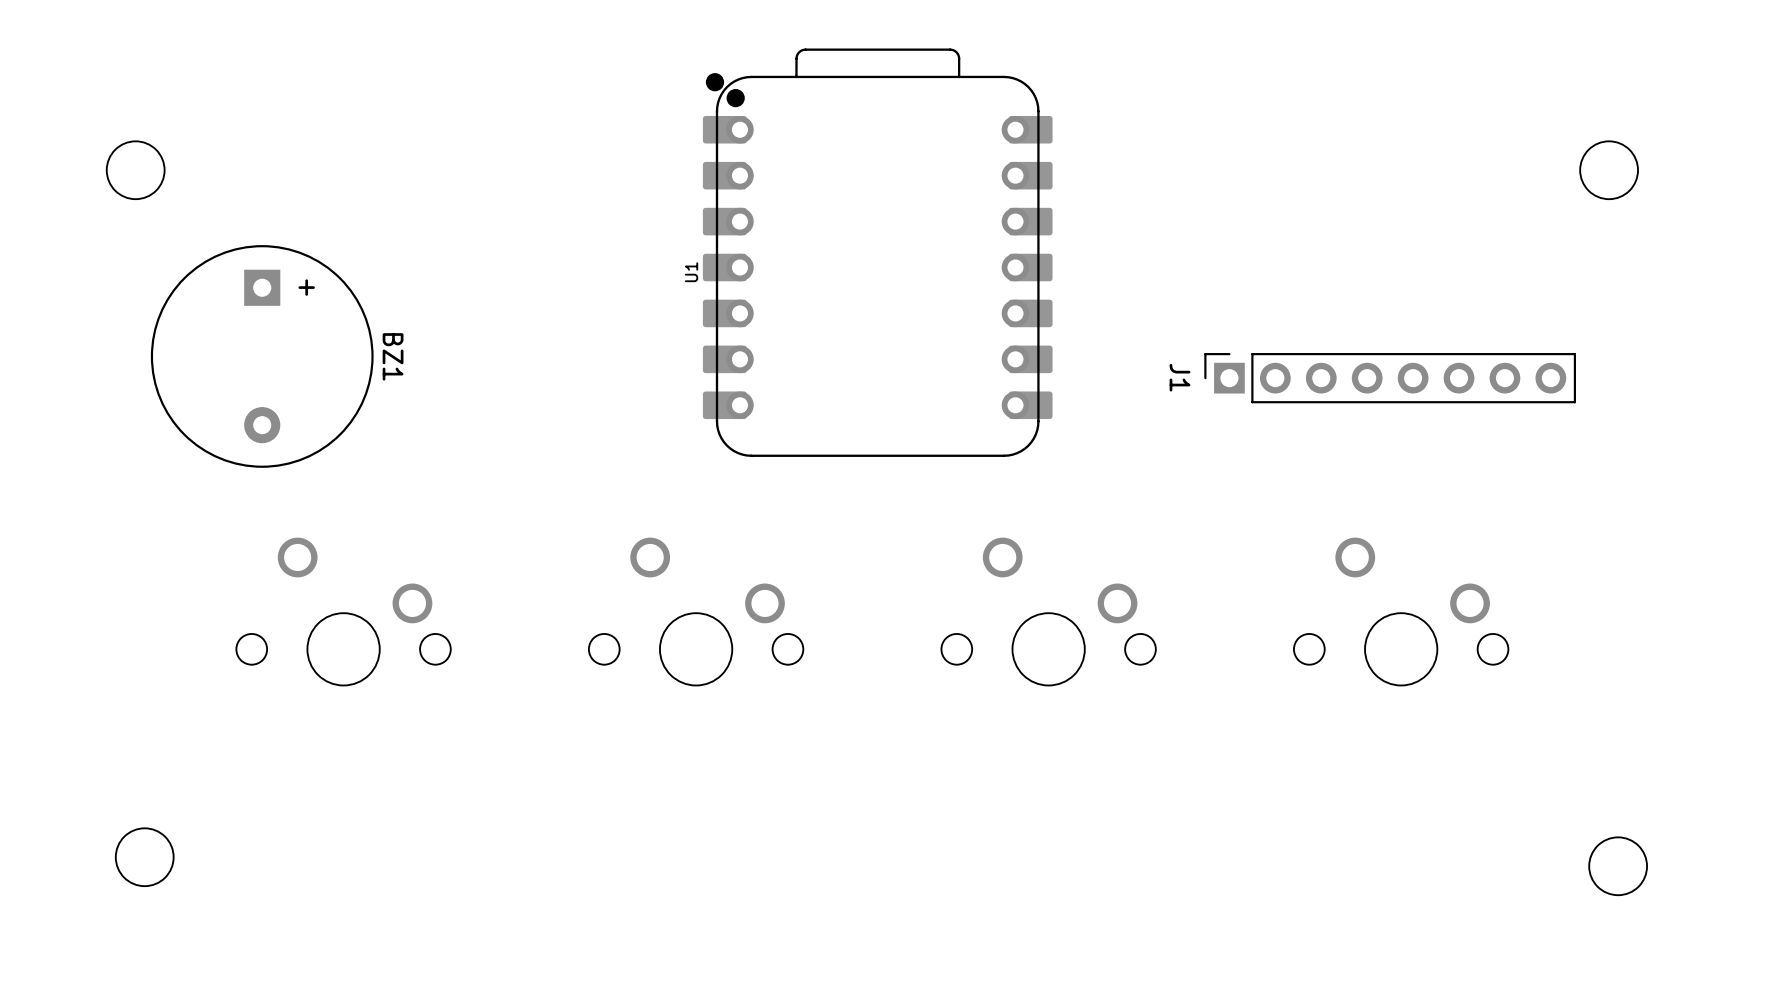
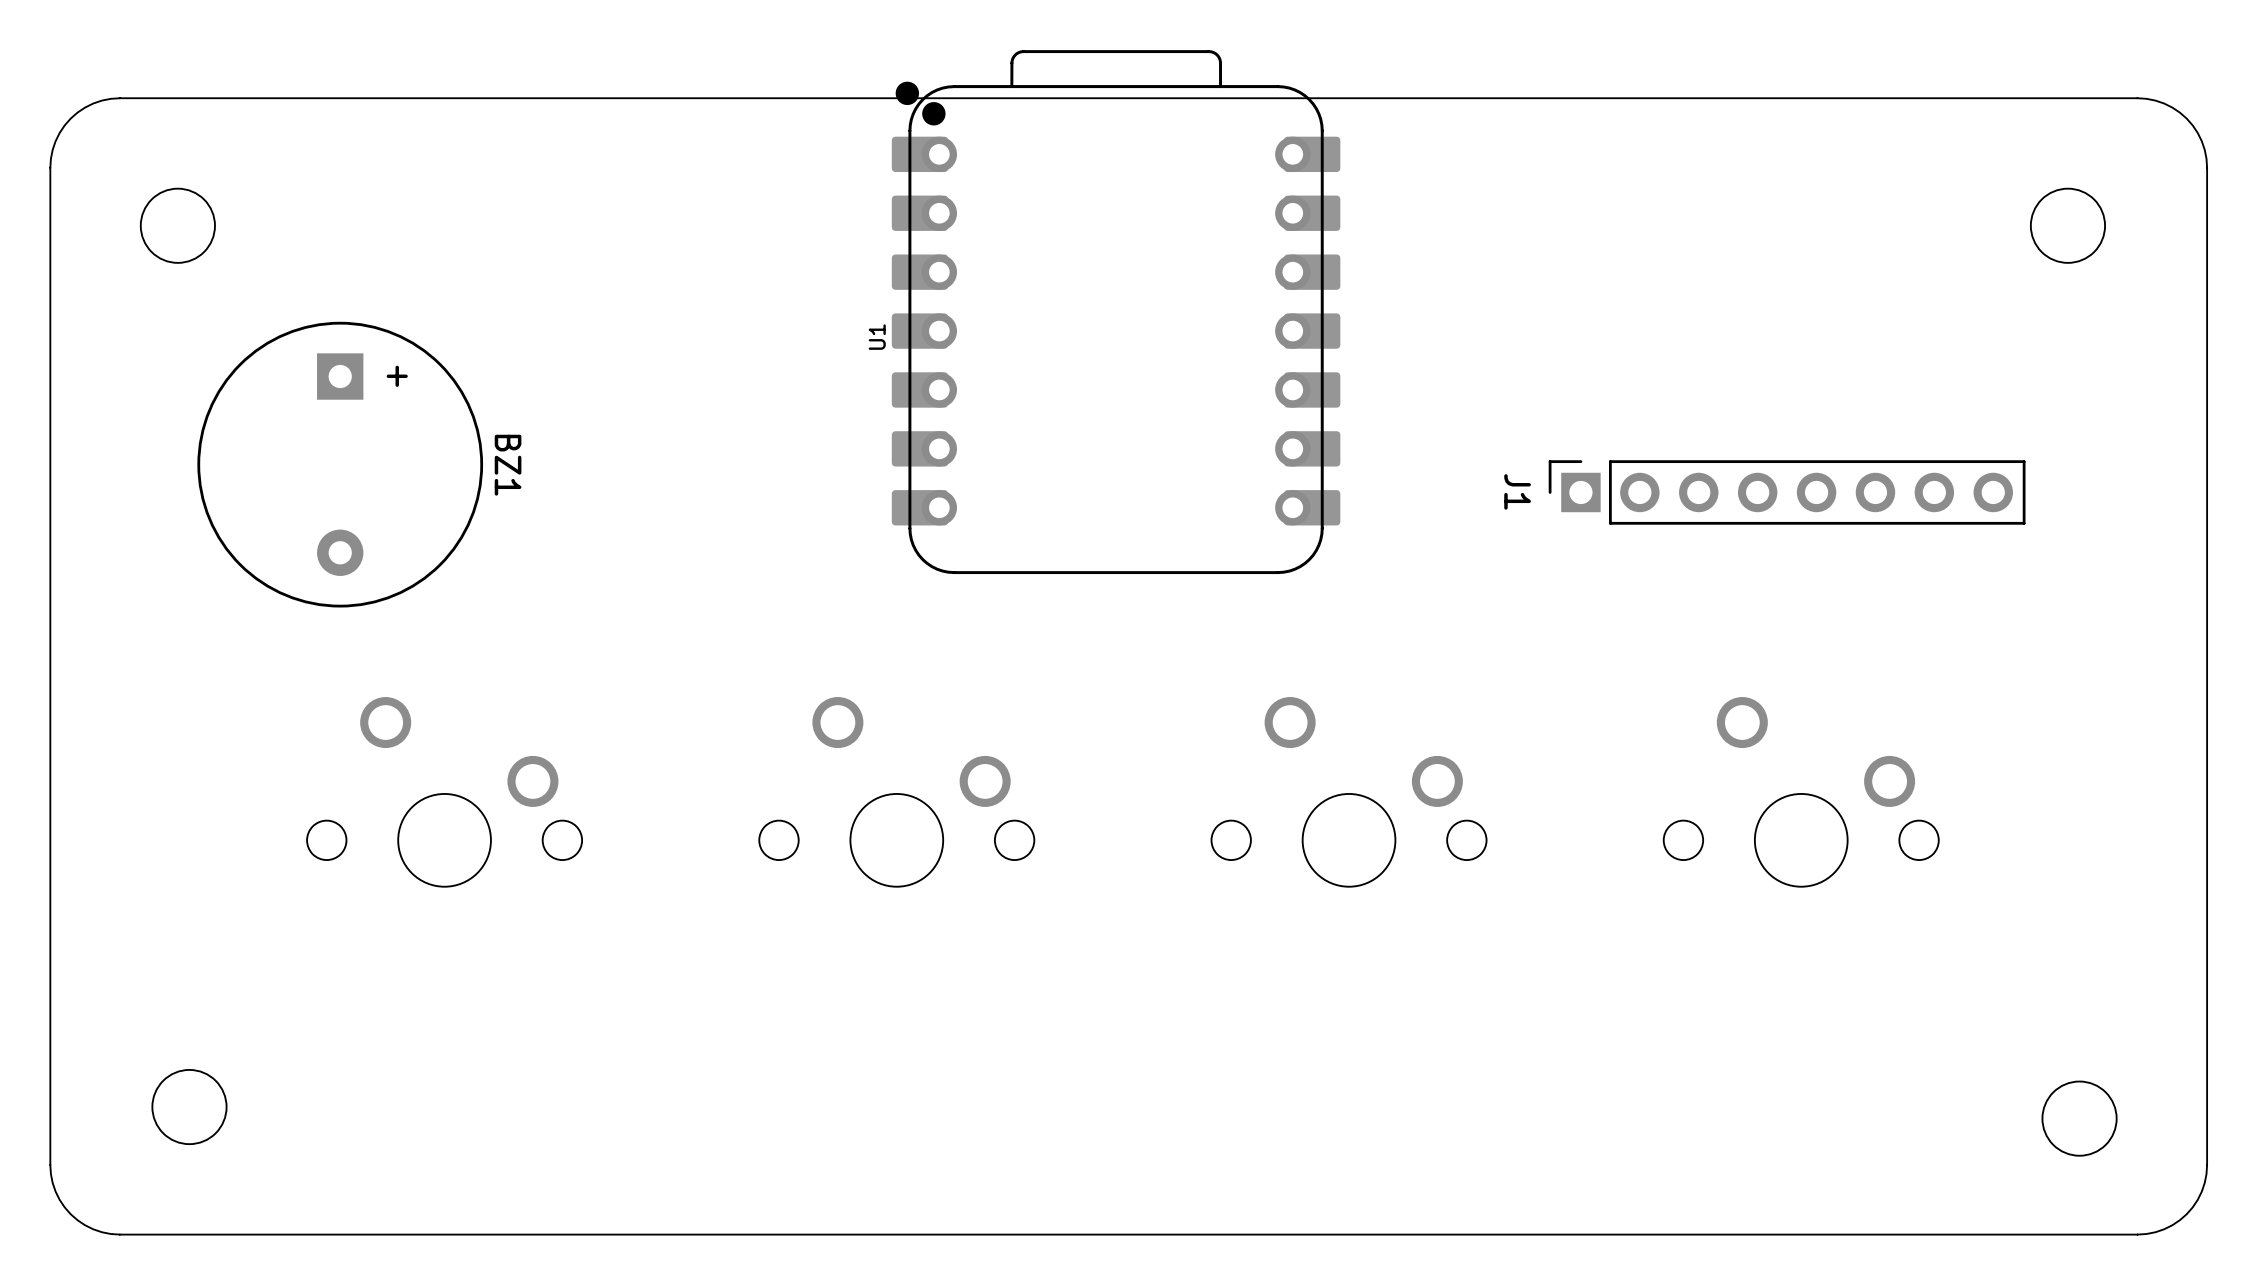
board edge: none -> (2137, 98) (119, 98) (101, 100) (85, 107) (70, 118) (59, 133) (52, 149) (50, 167) (50, 1165) (52, 1183) (59, 1199) (70, 1214) (85, 1225) (101, 1232) (119, 1234) (2137, 1234) (2155, 1232) (2172, 1225) (2186, 1214) (2197, 1199) (2204, 1183) (2207, 1165) (2207, 167) (2201, 141) (2186, 118) (2164, 103) (2137, 98)
U1 position: (877, 252) -> (1116, 312)

